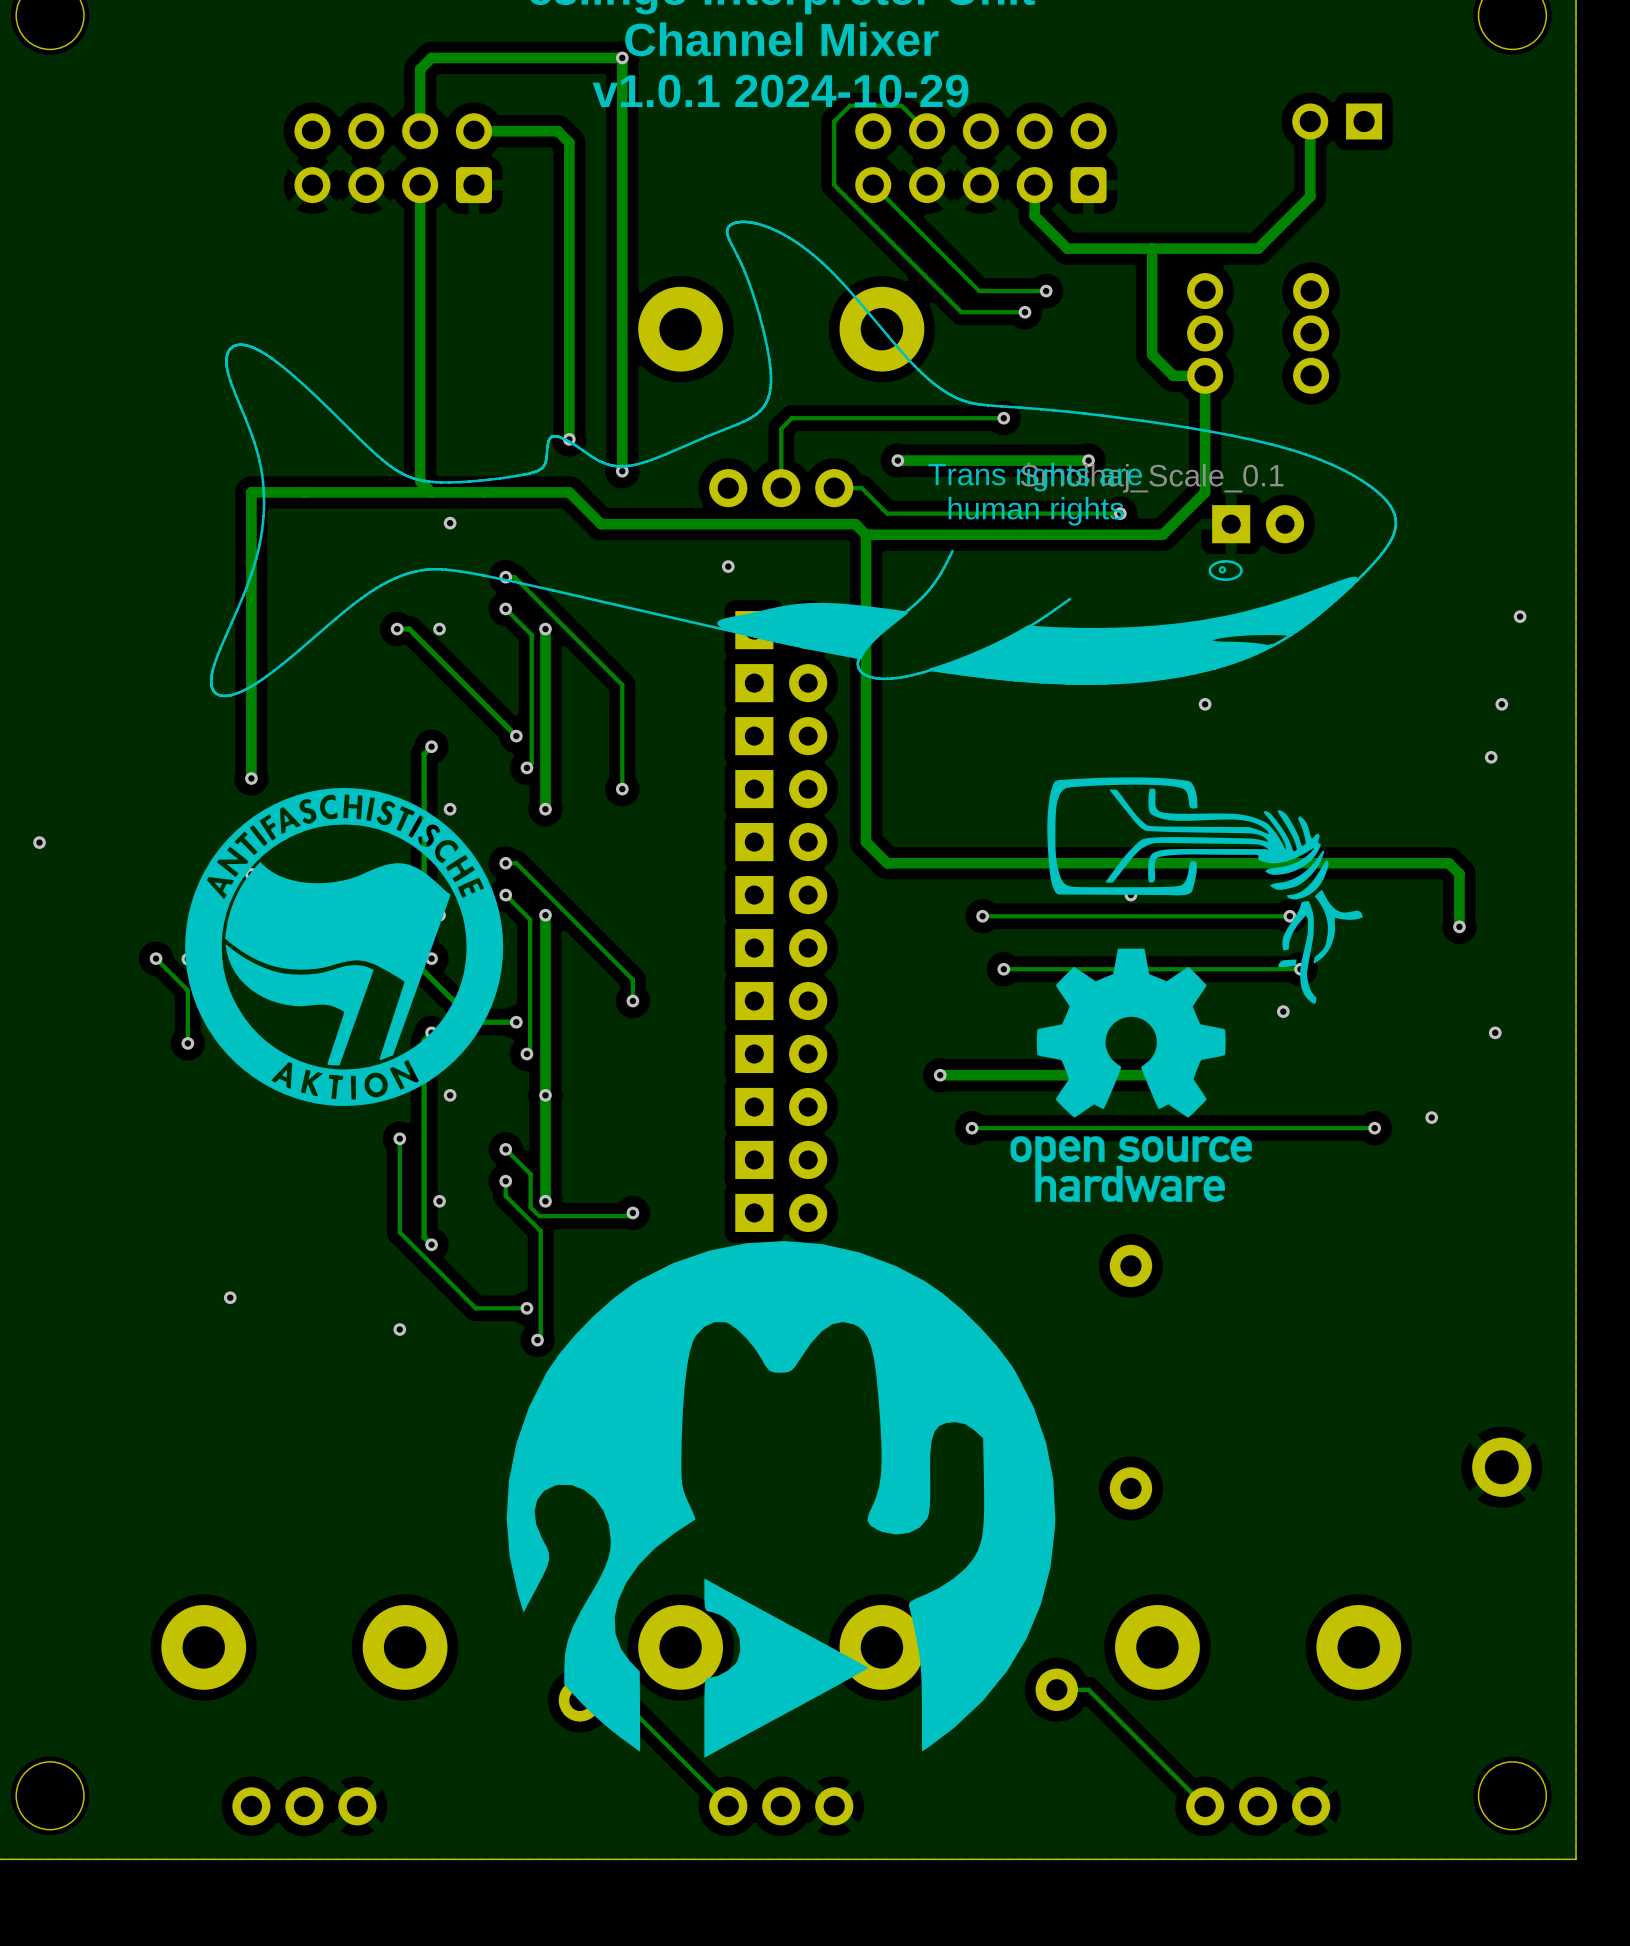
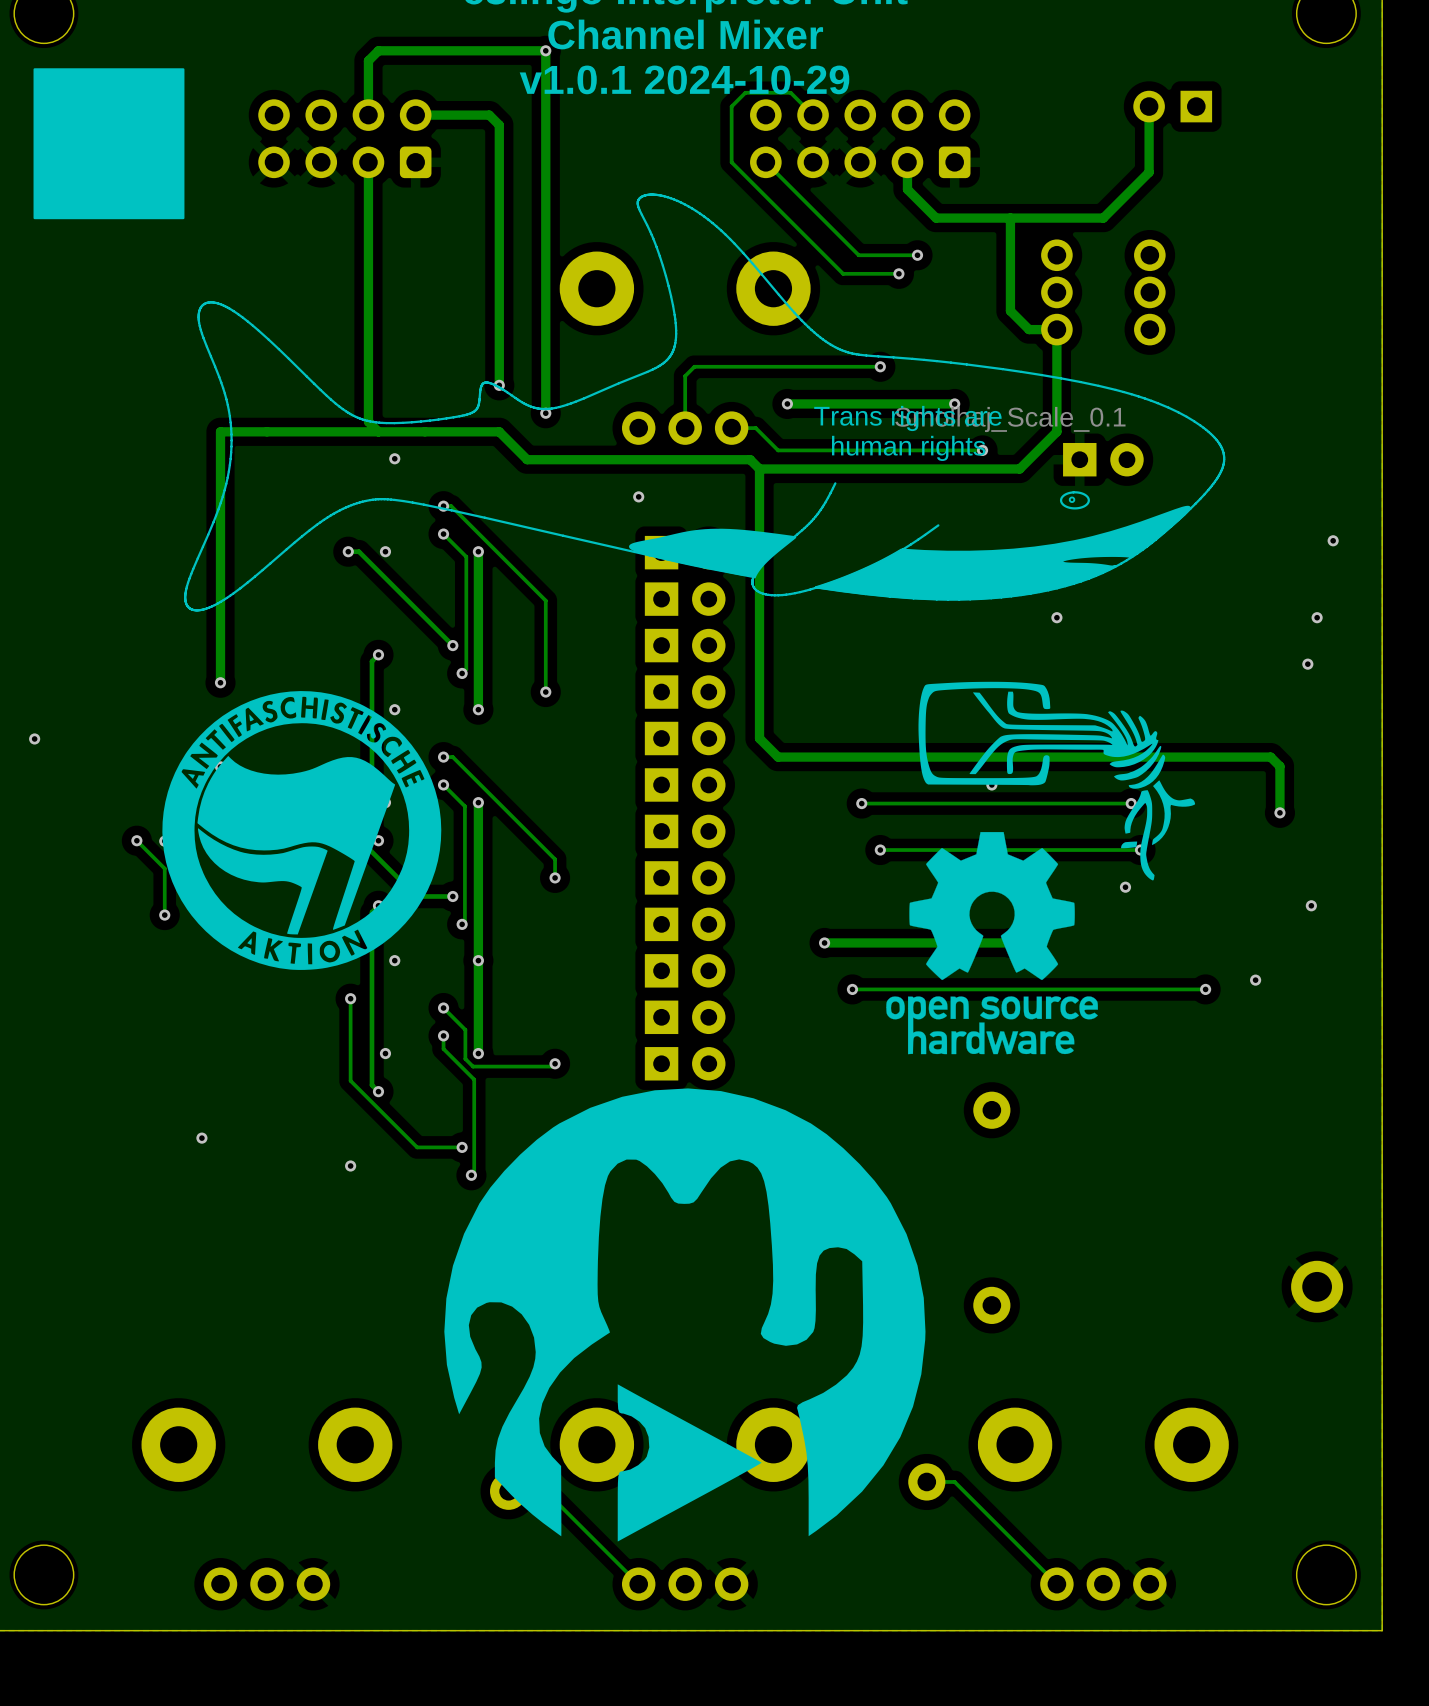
drawing: none -> [33, 68, 185, 220]

